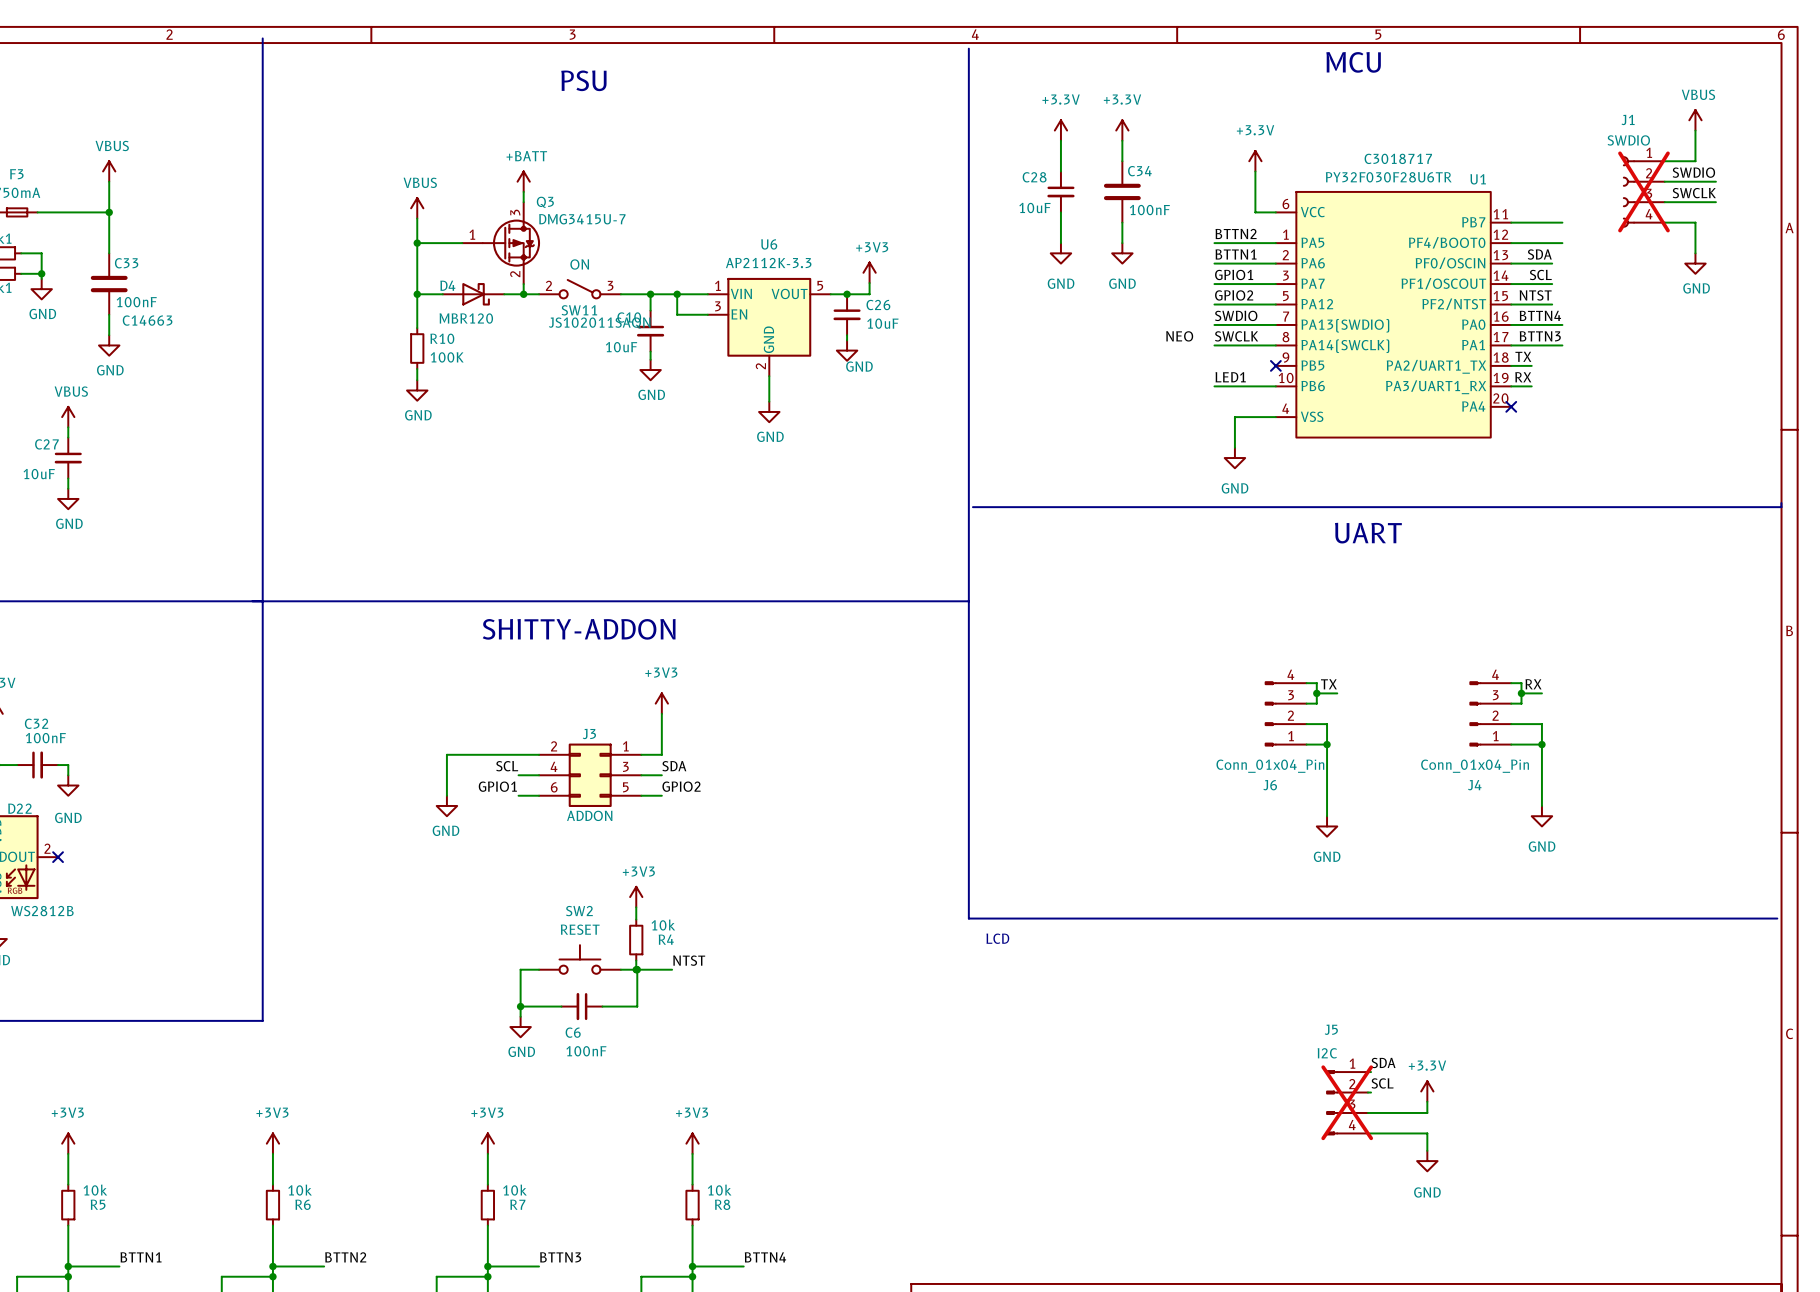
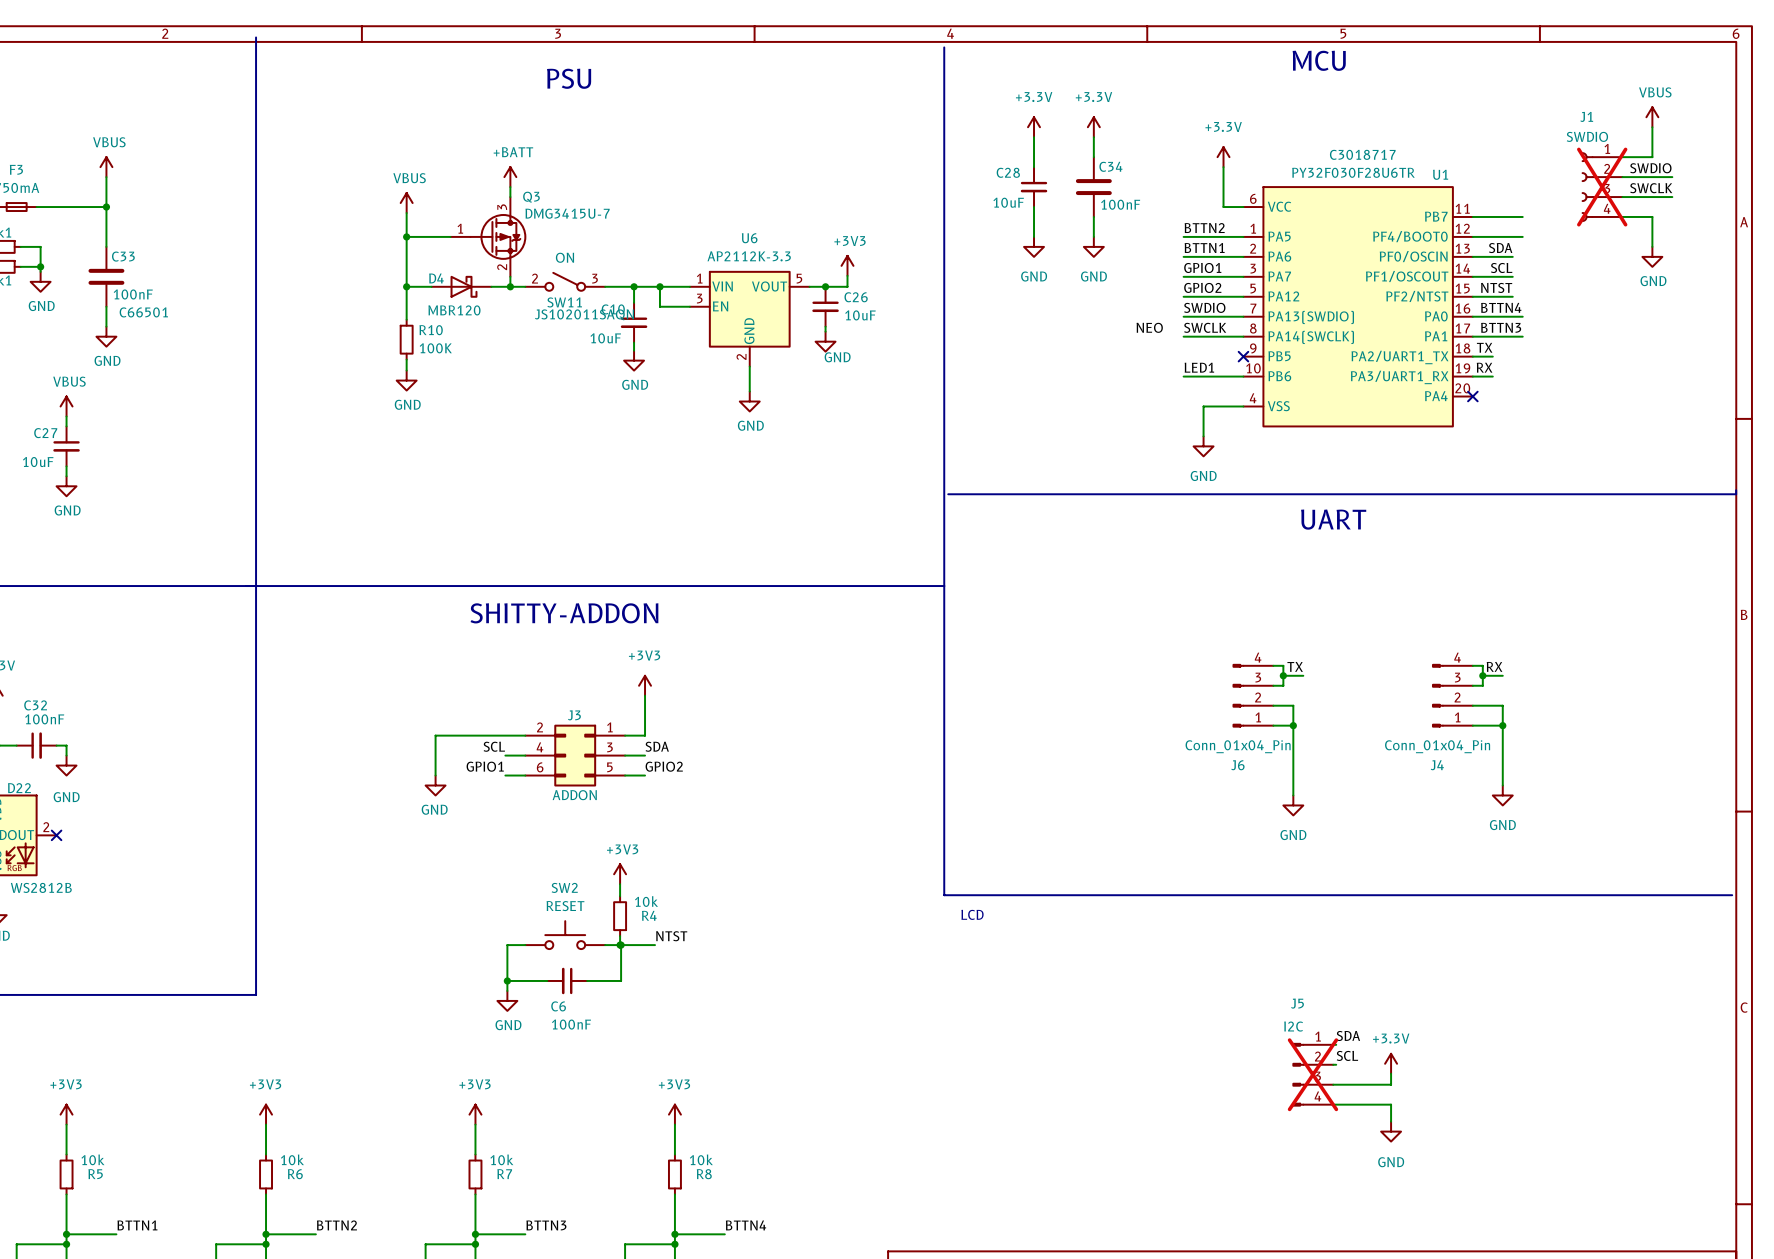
C33 text: C14663 (147, 320) -> C66501 (143, 312)

